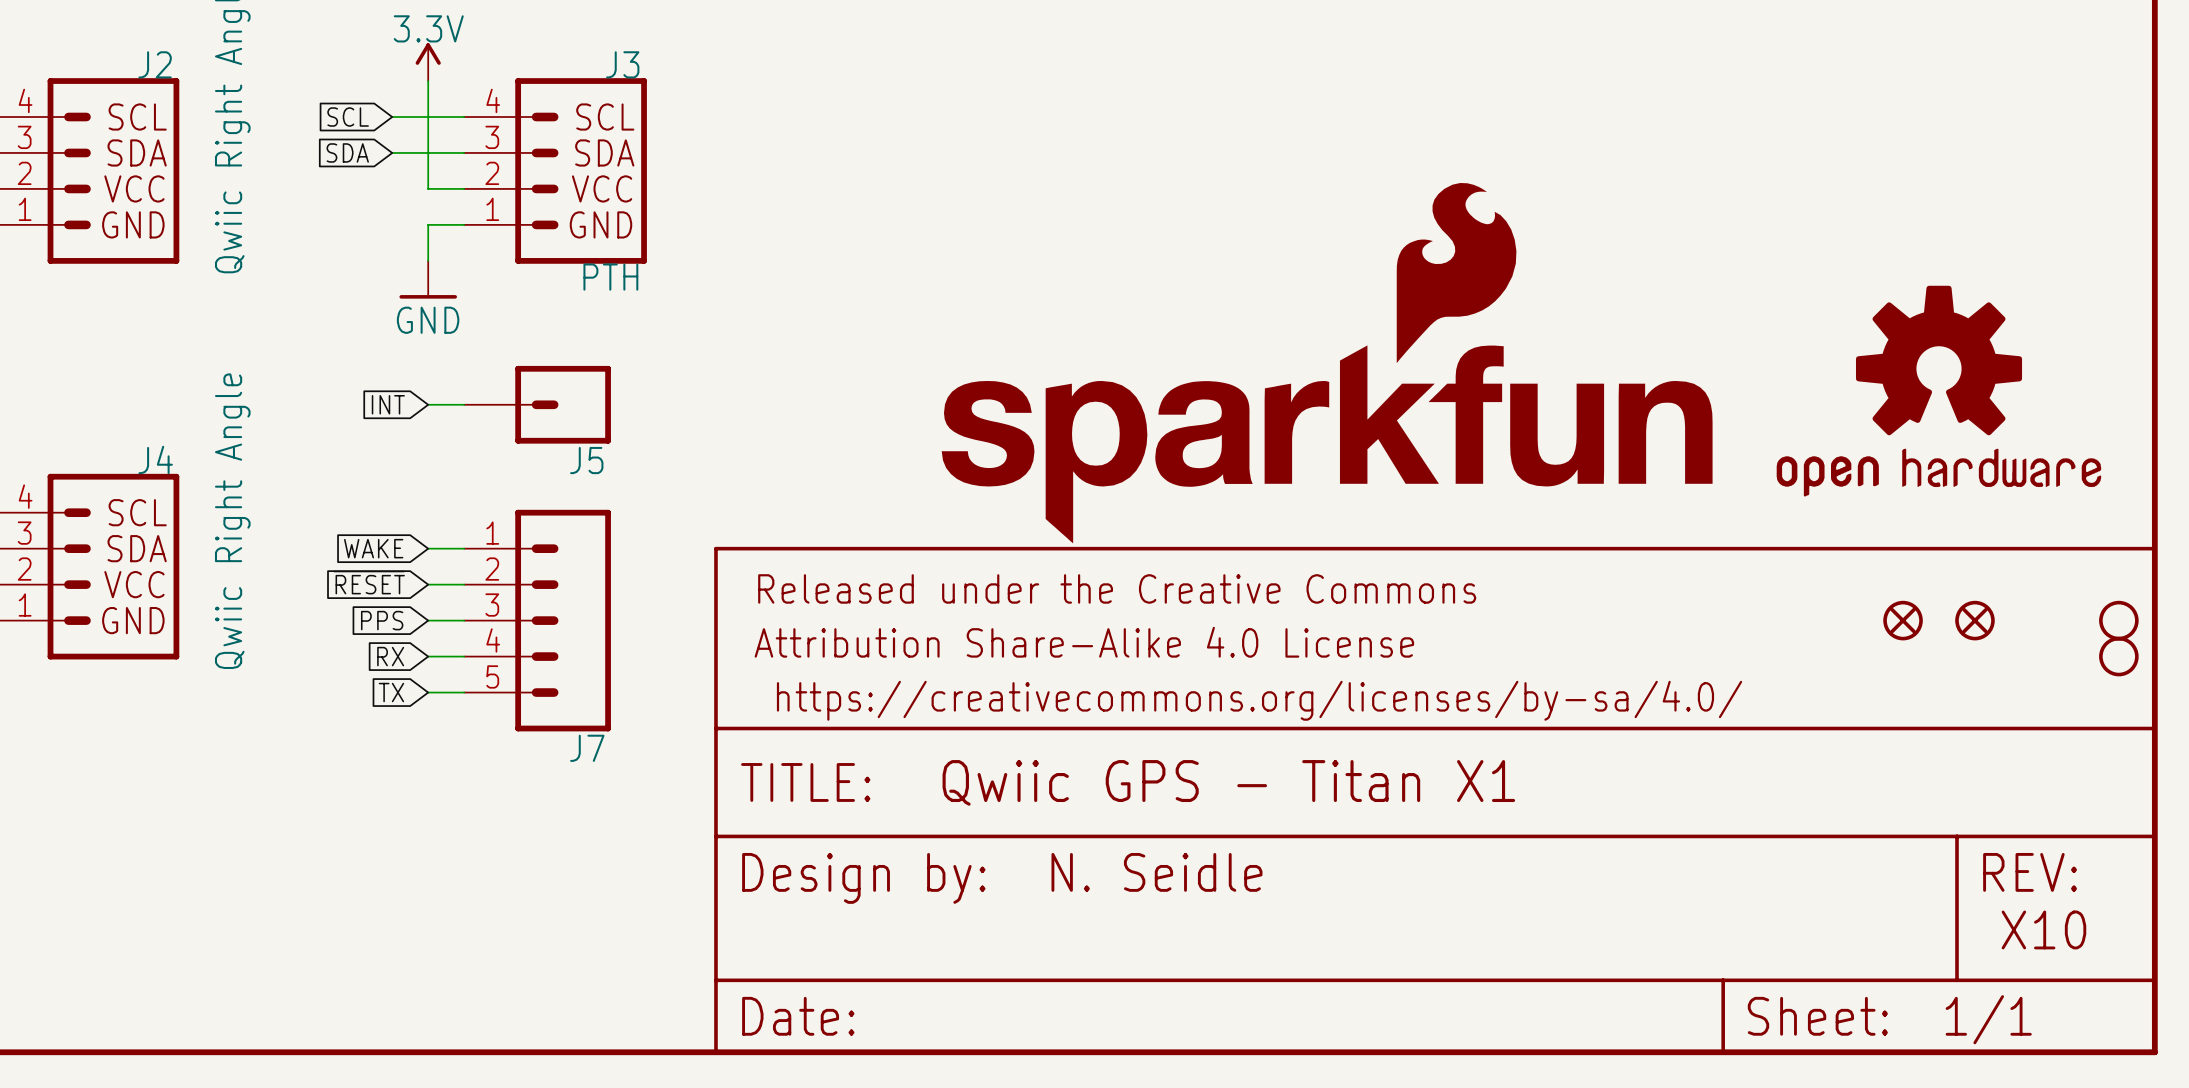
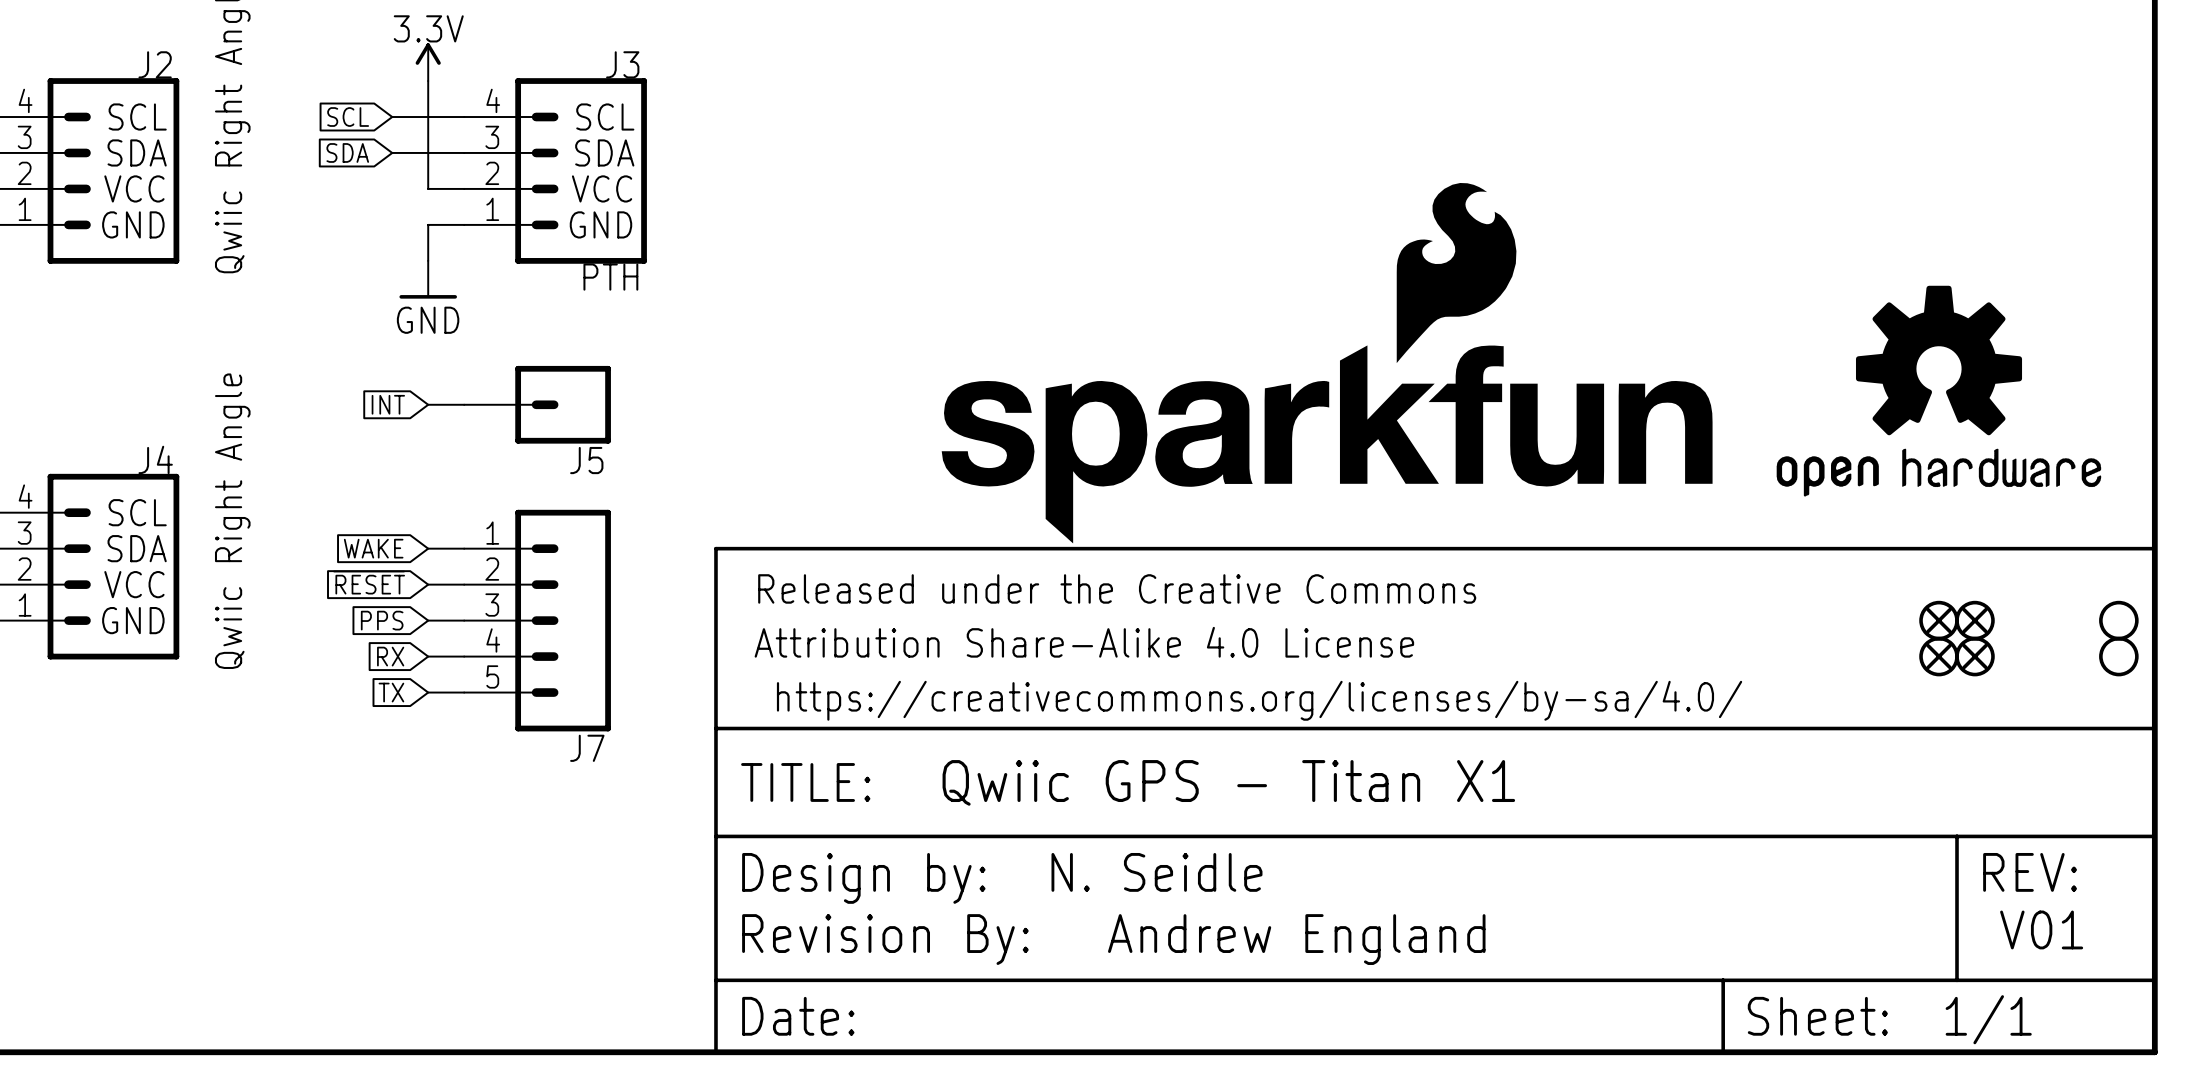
part: (1903, 620) -> none
part: none -> (1939, 620)
part: none -> (1939, 656)
part: none -> (1974, 656)
text: X10 (2043, 929) -> V01 (2041, 929)
part: none -> (885, 939)
text: none -> Andrew England (1296, 939)

